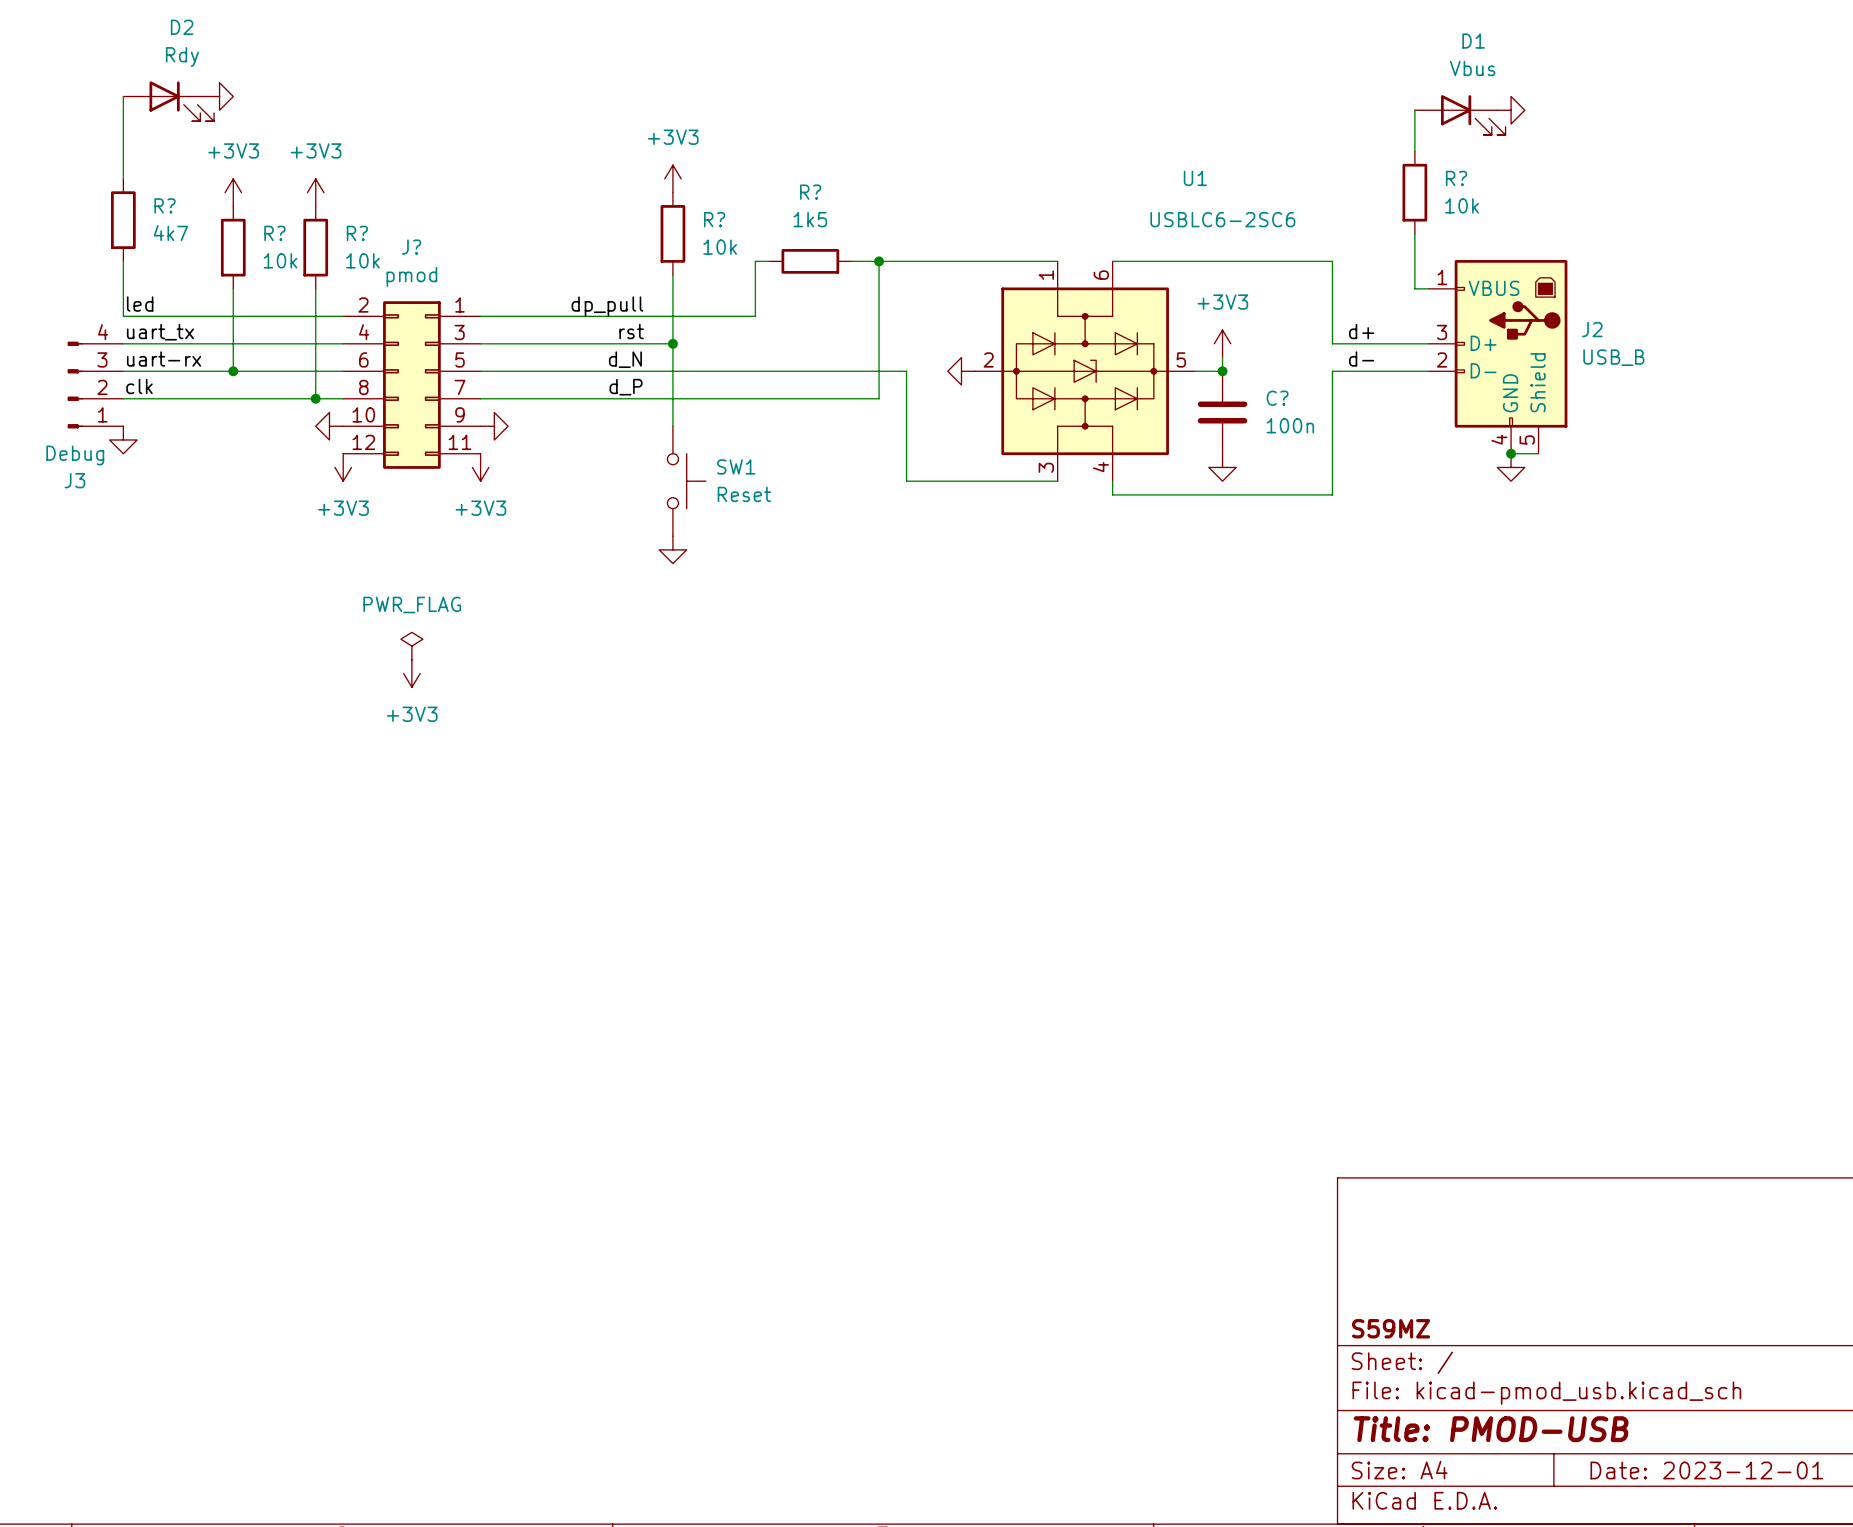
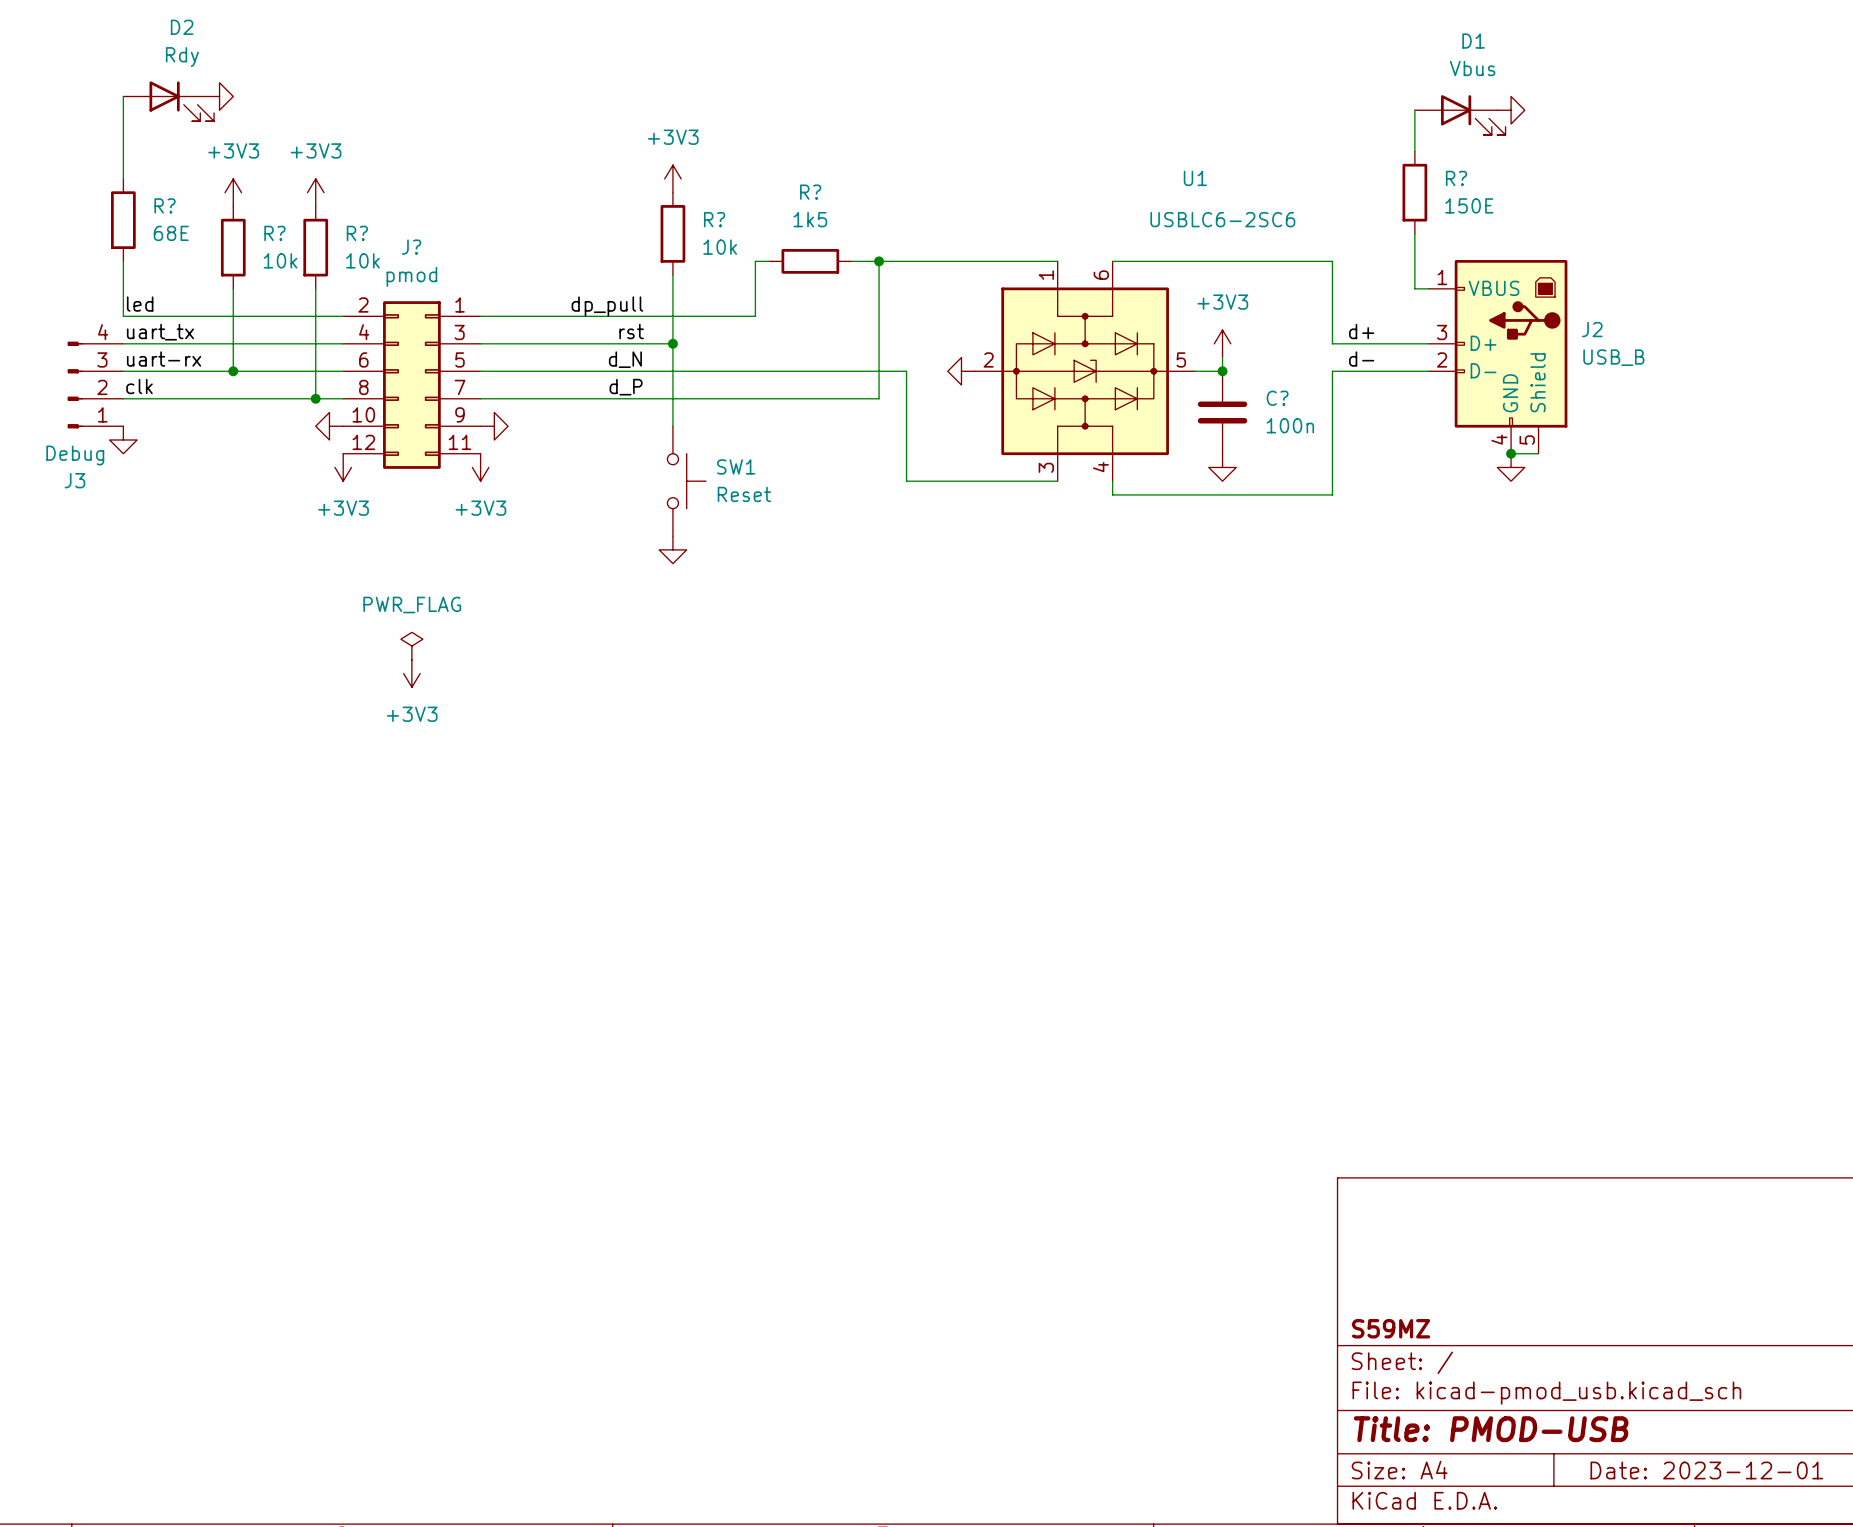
R? value: 10k (1462, 205) -> 150E (1469, 205)
R? value: 4k7 (170, 233) -> 68E (171, 233)

